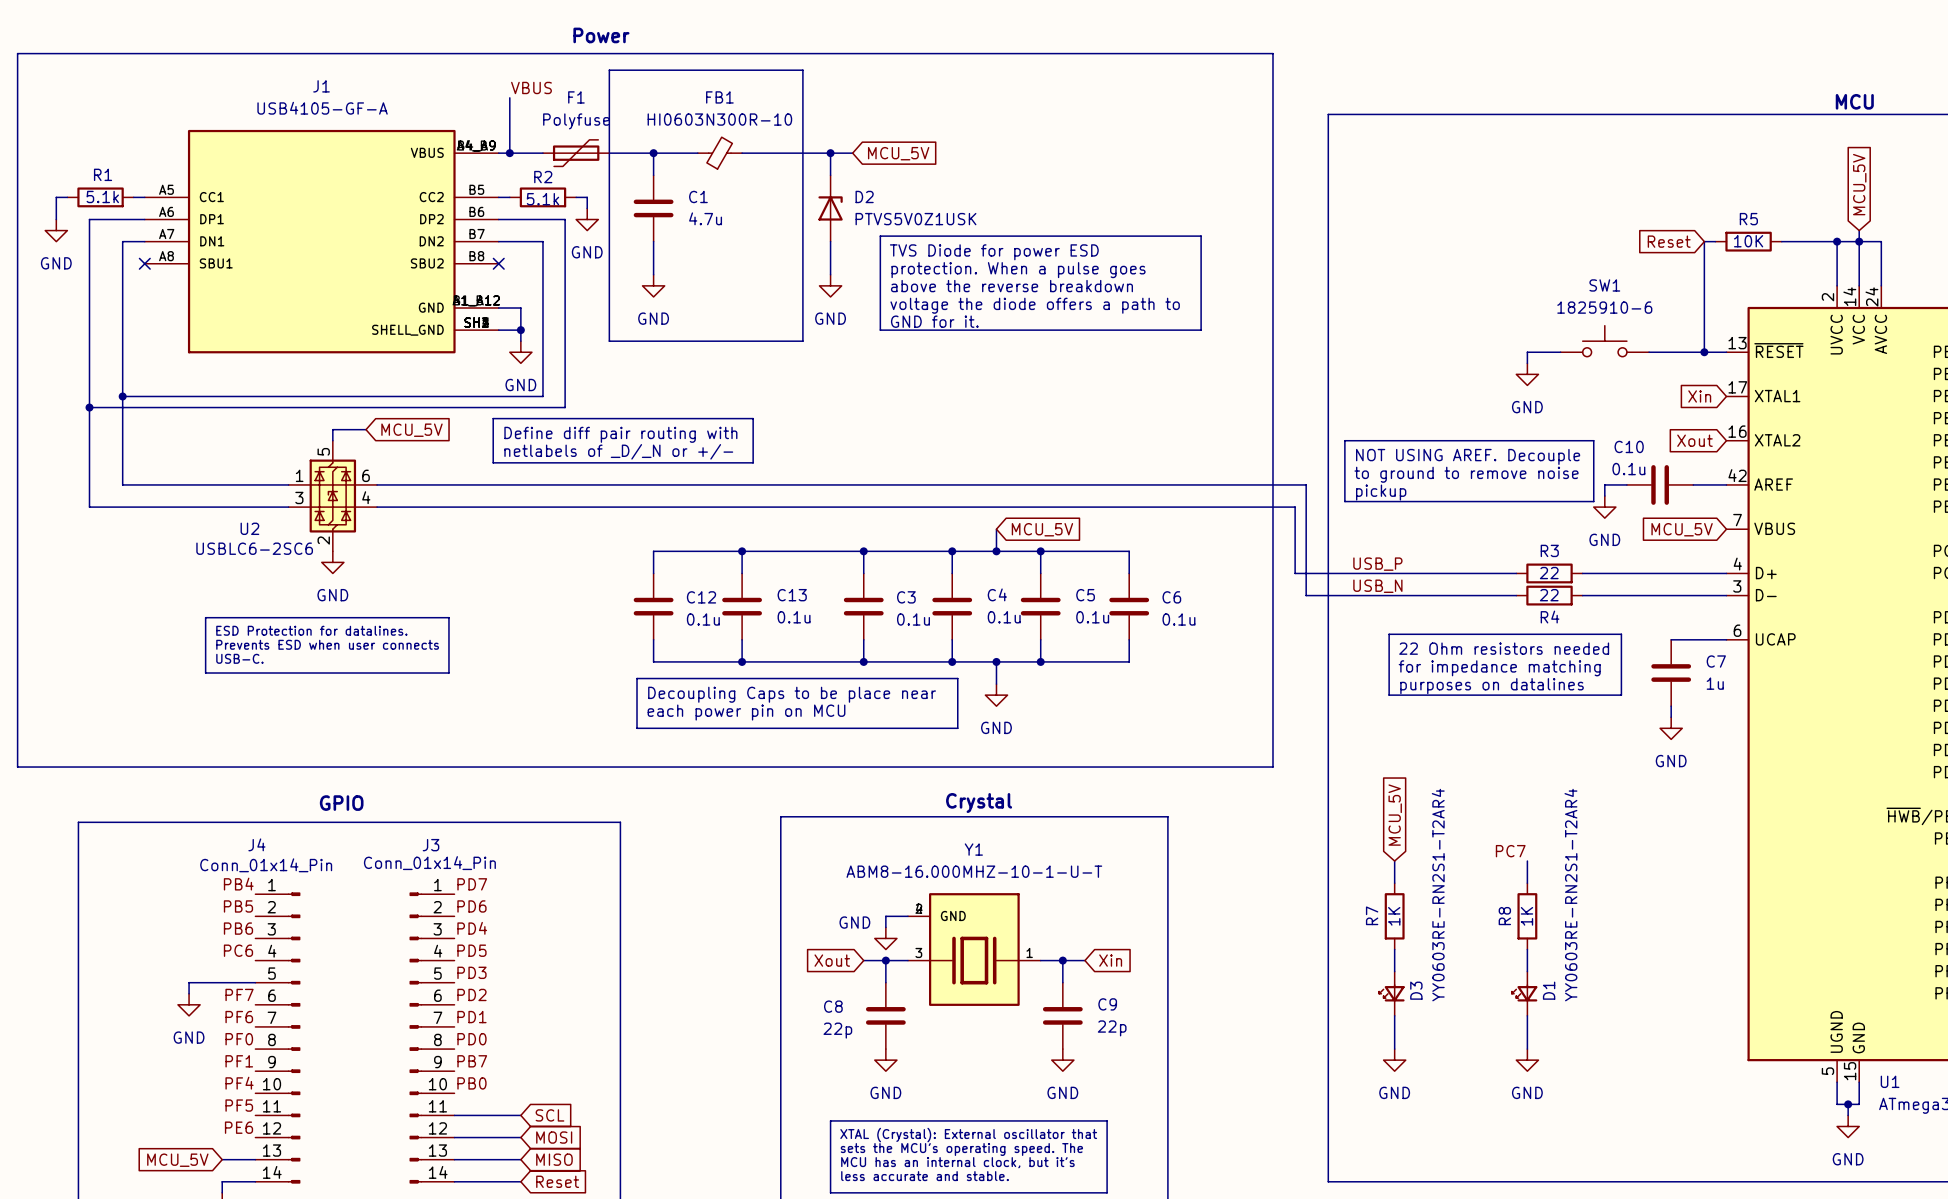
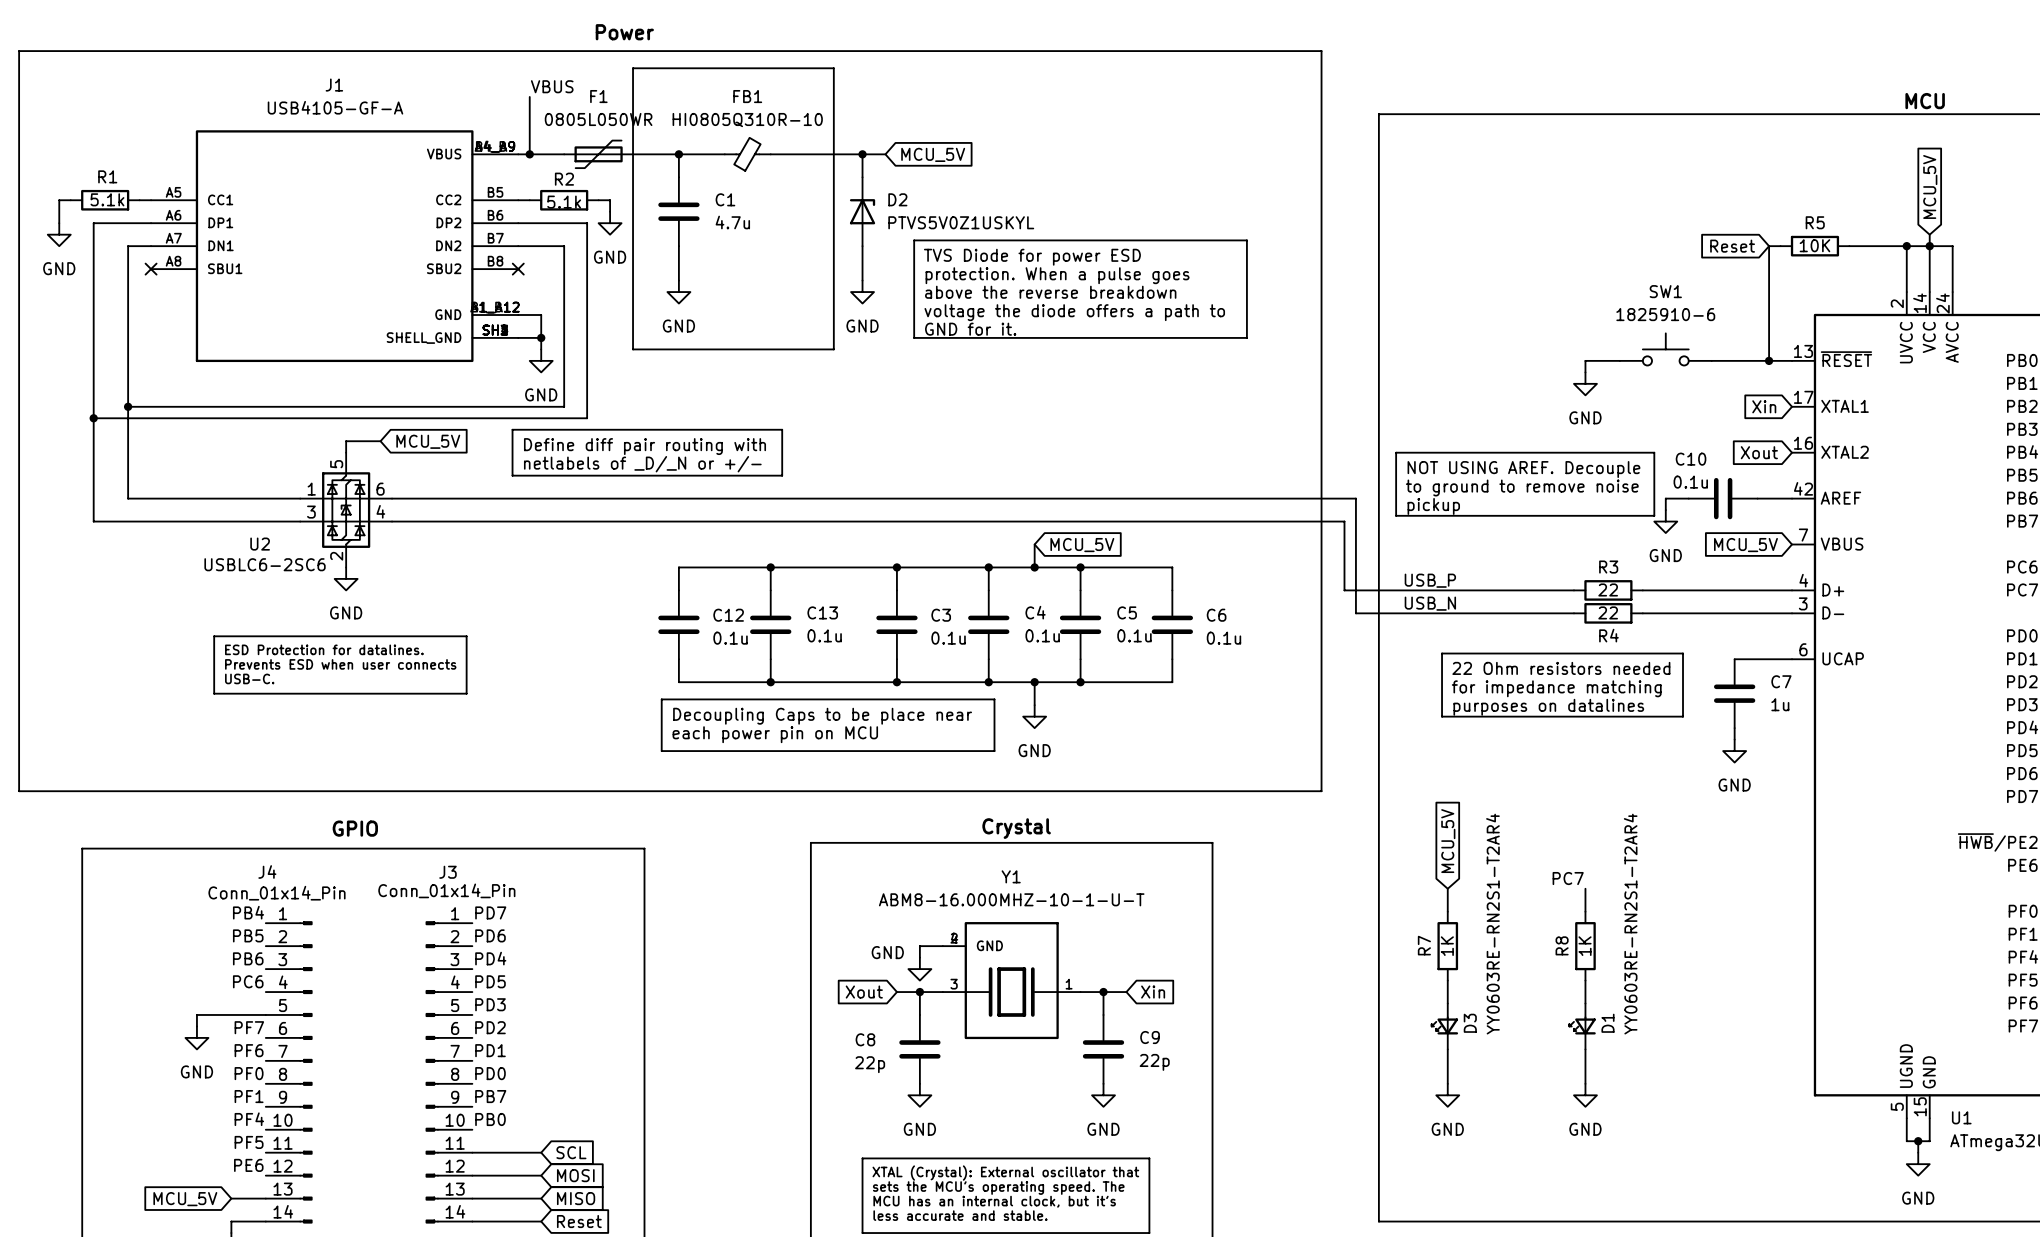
FB1 value: HI0603N300R-10 (719, 119) -> HI0805Q310R-10 (747, 120)
F1 value: Polyfuse (576, 121) -> 0805L050WR (598, 119)
D2 value: PTVS5V0Z1USK (915, 219) -> PTVS5V0Z1USKYL (961, 222)

